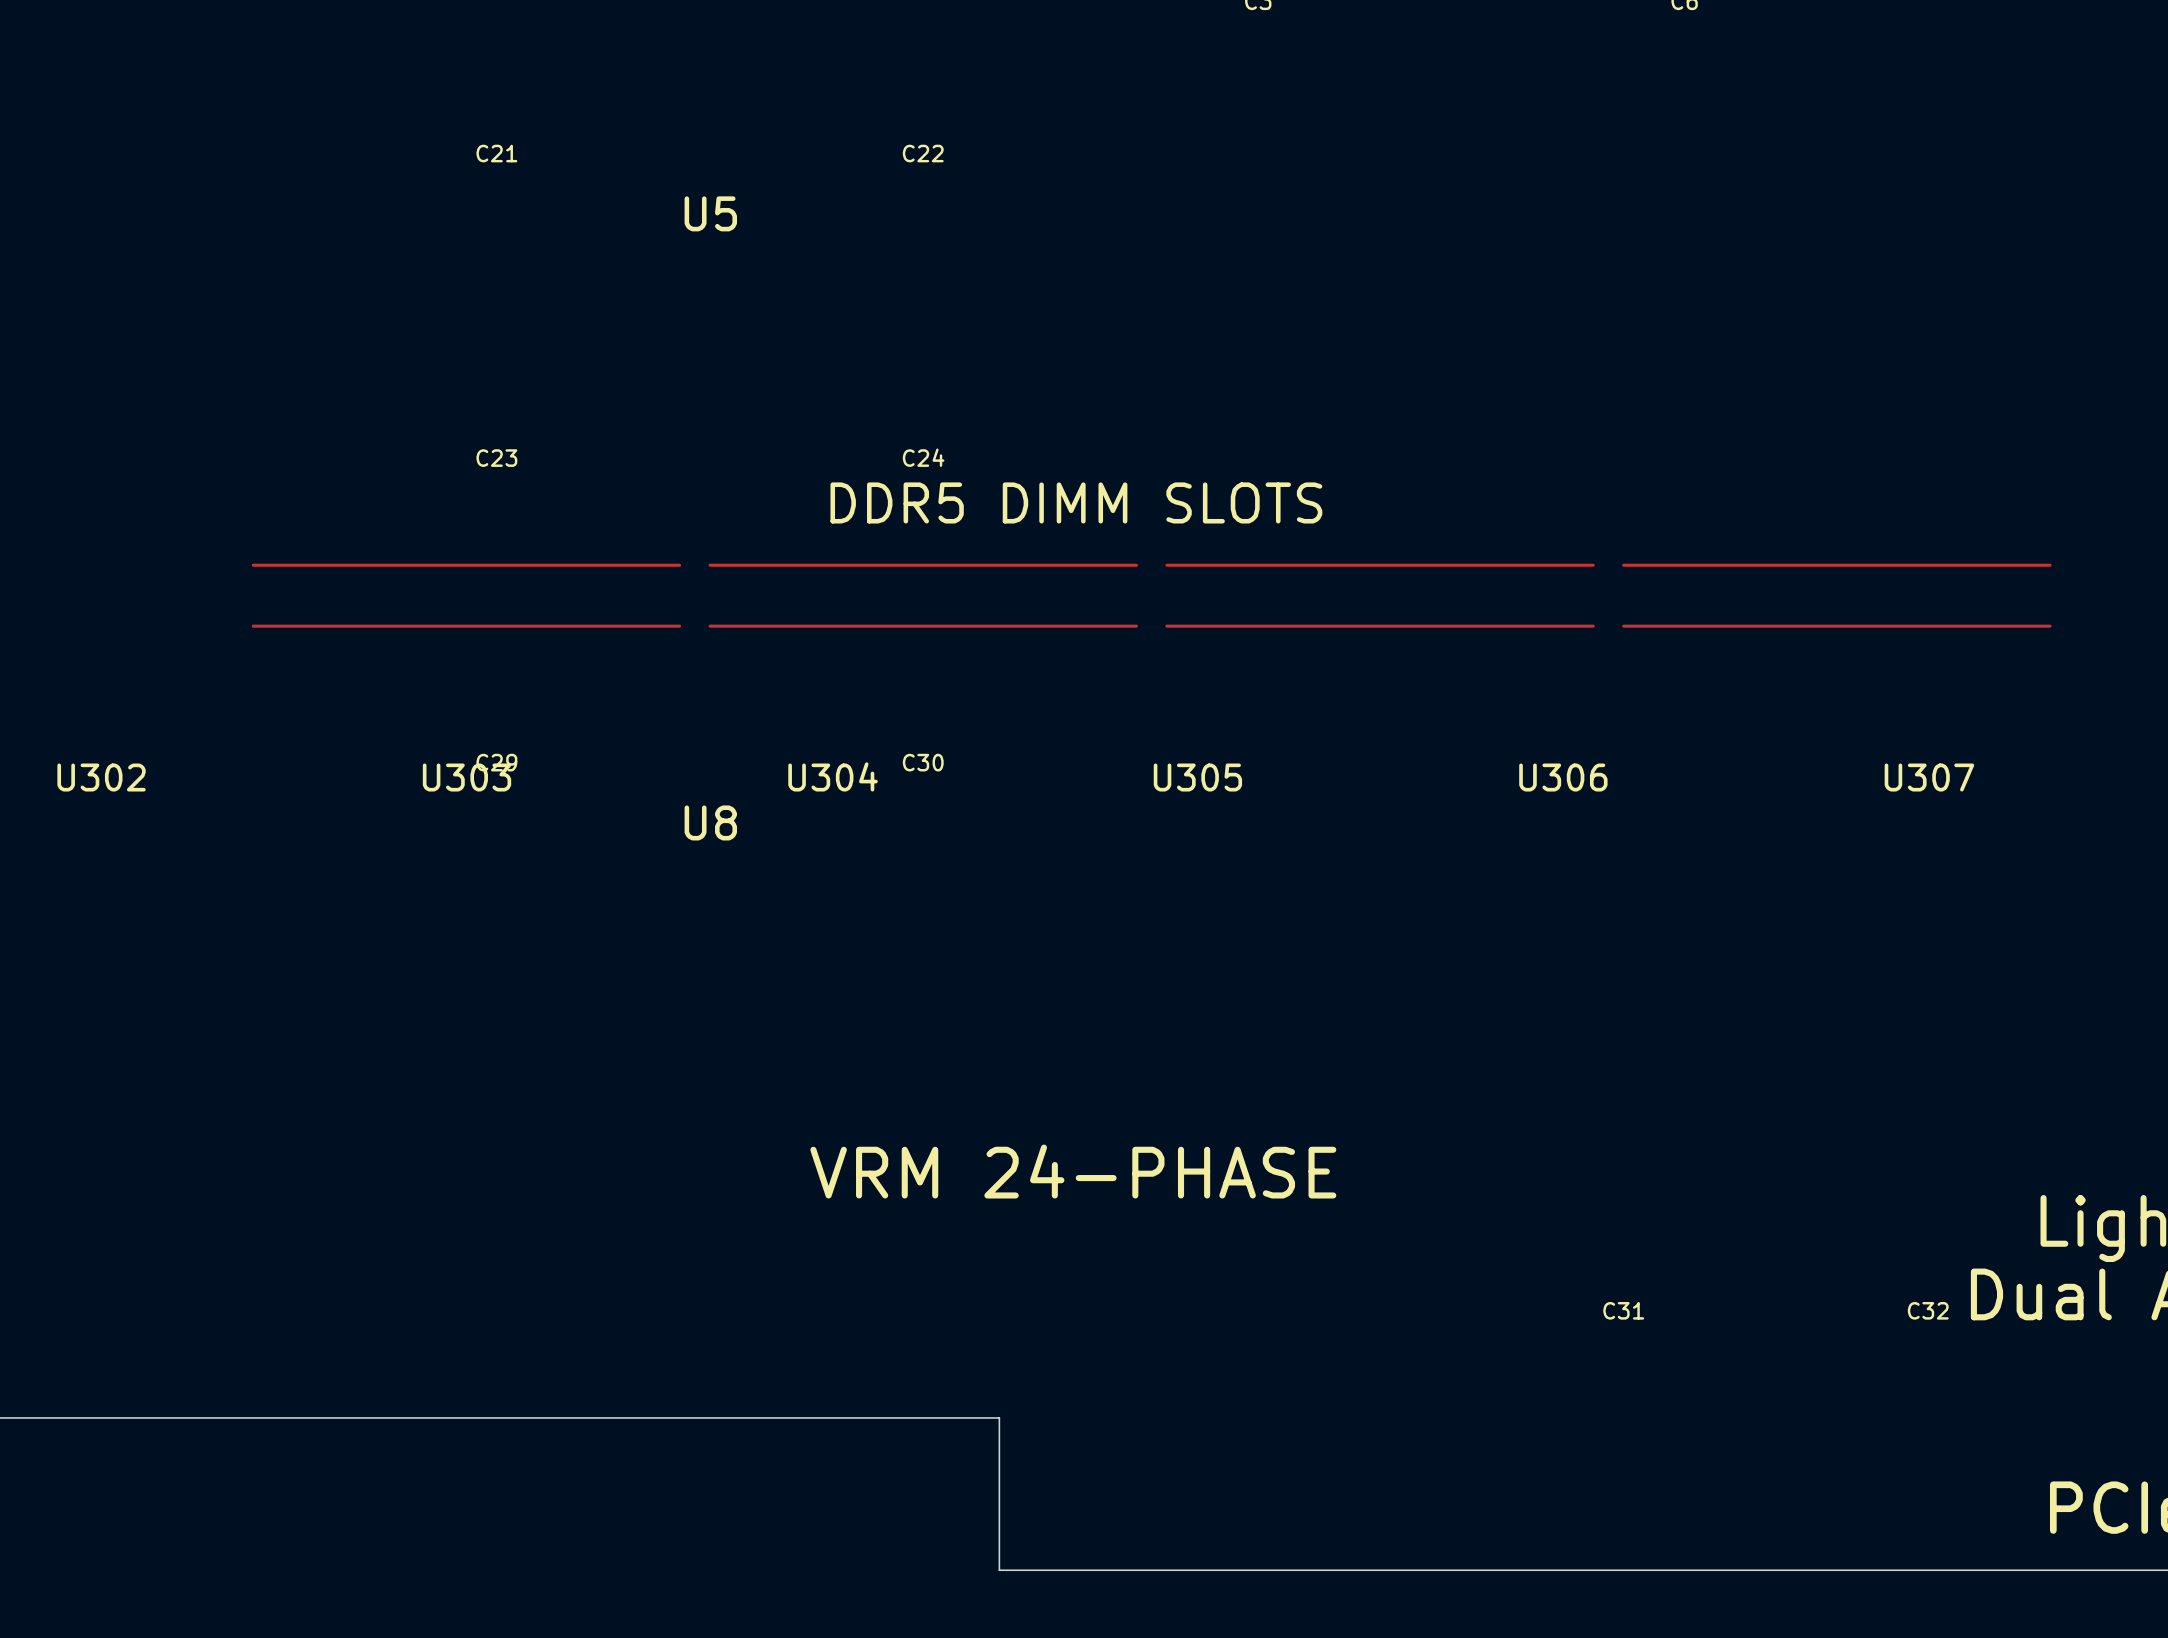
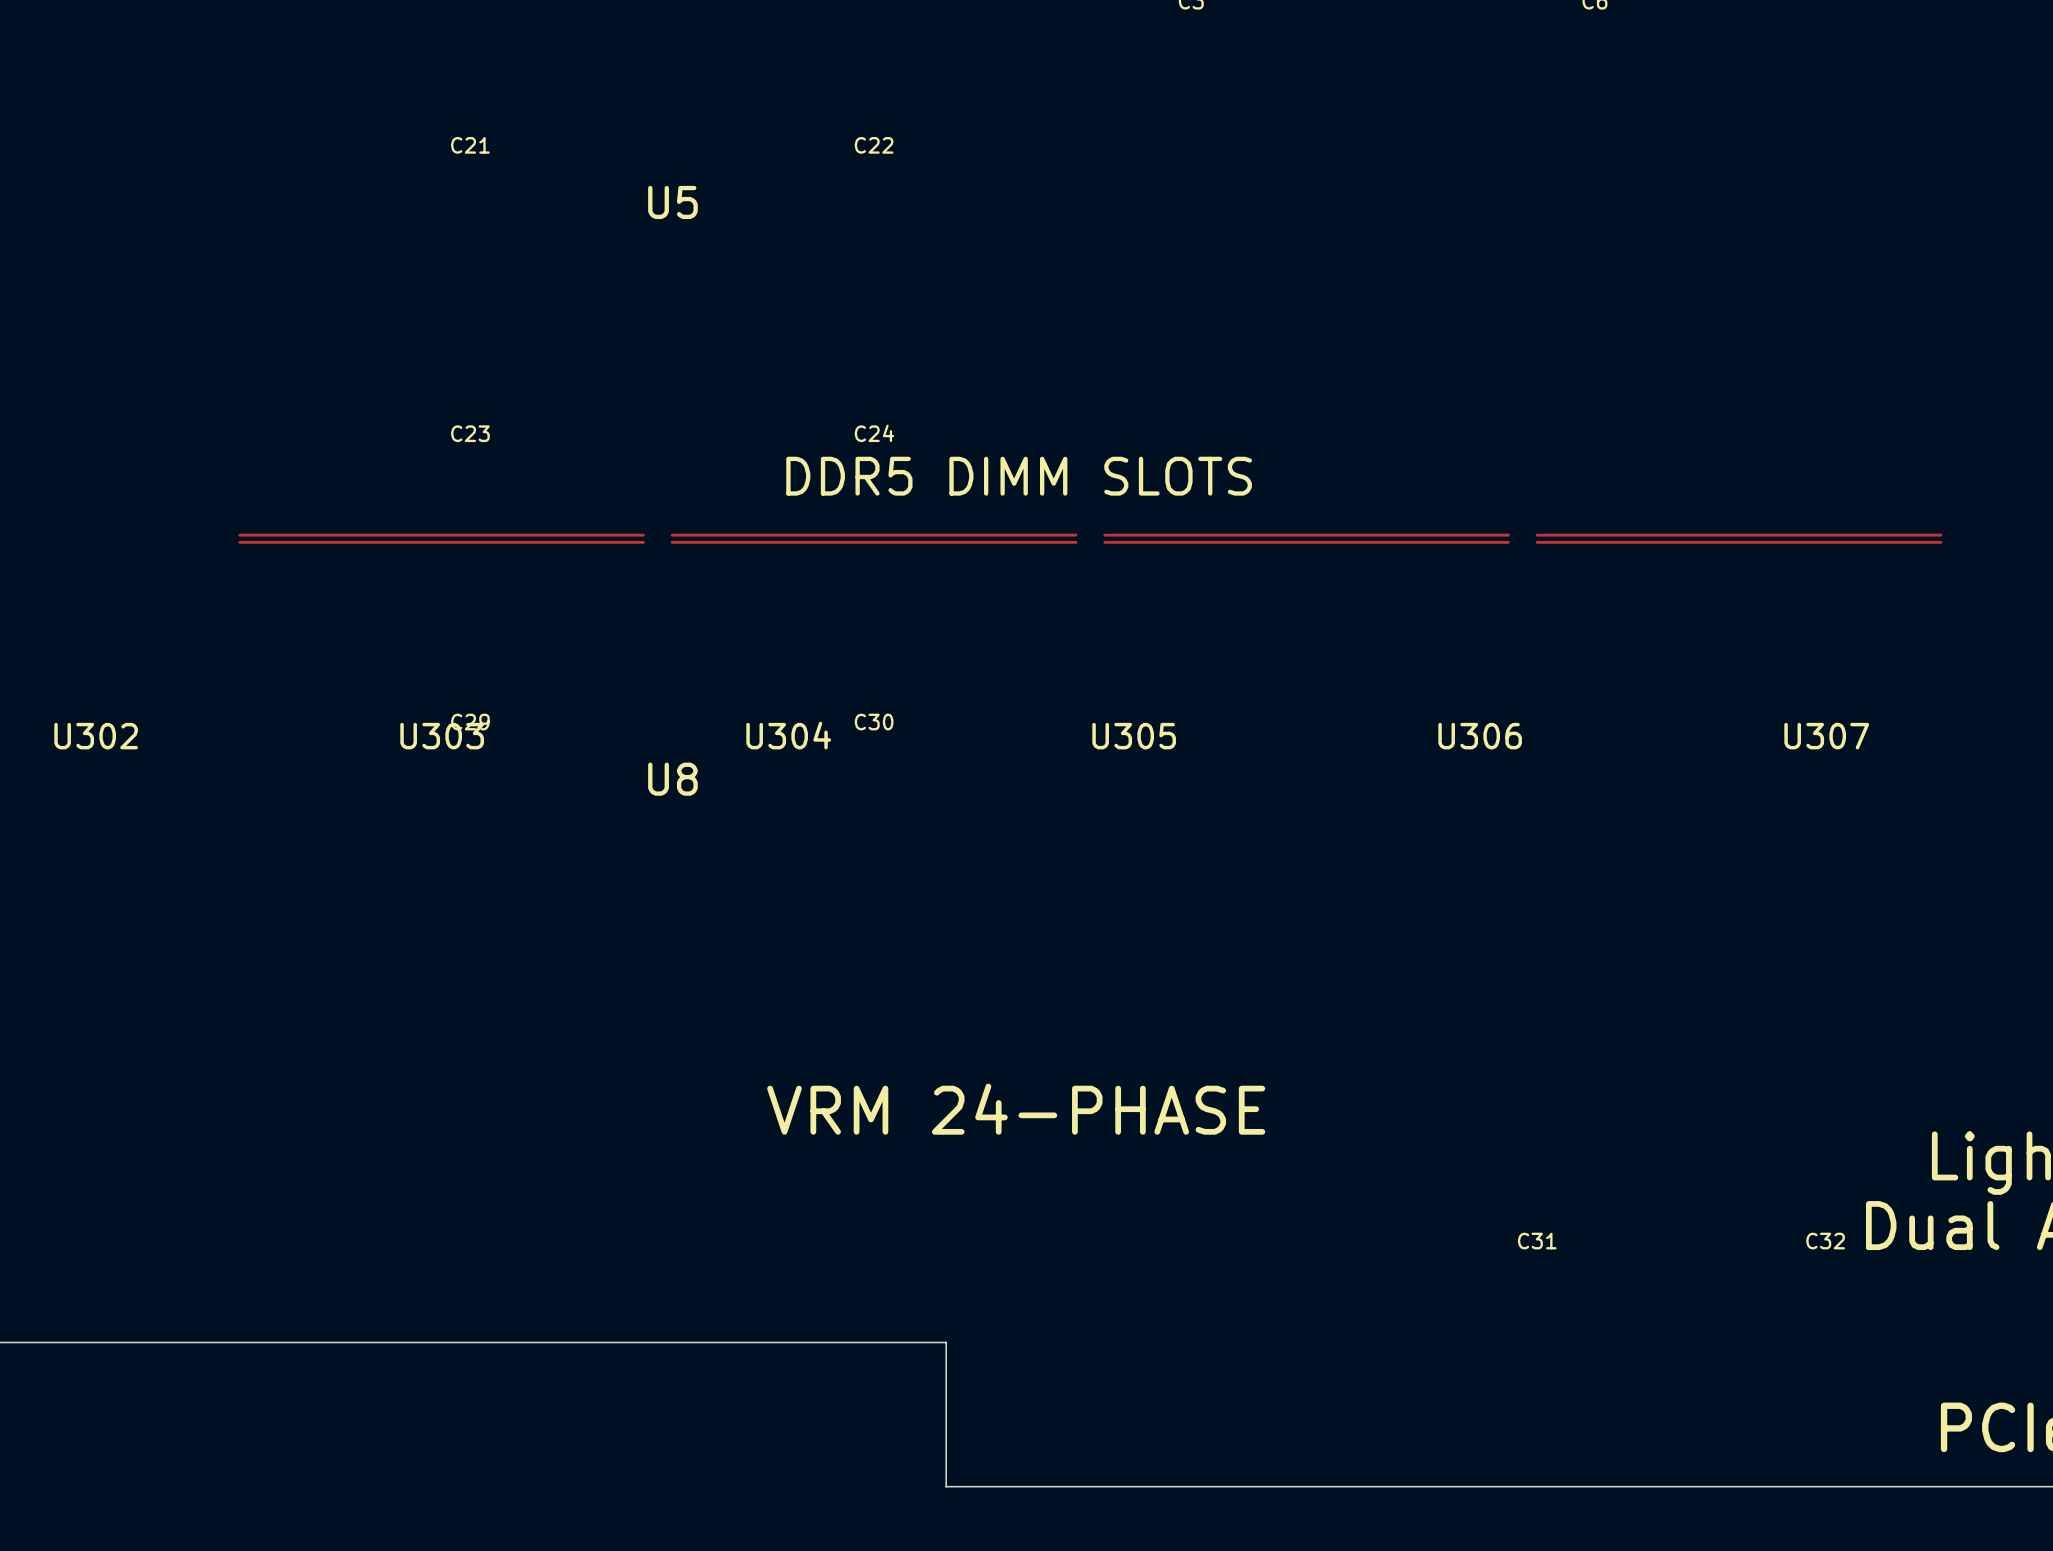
track: (253, 626) (679, 626) -> (239, 542) (643, 542)
track: (710, 626) (1136, 626) -> (672, 542) (1075, 542)
track: (1166, 626) (1593, 626) -> (1104, 542) (1508, 542)
track: (1623, 626) (2050, 626) -> (1537, 542) (1940, 542)

